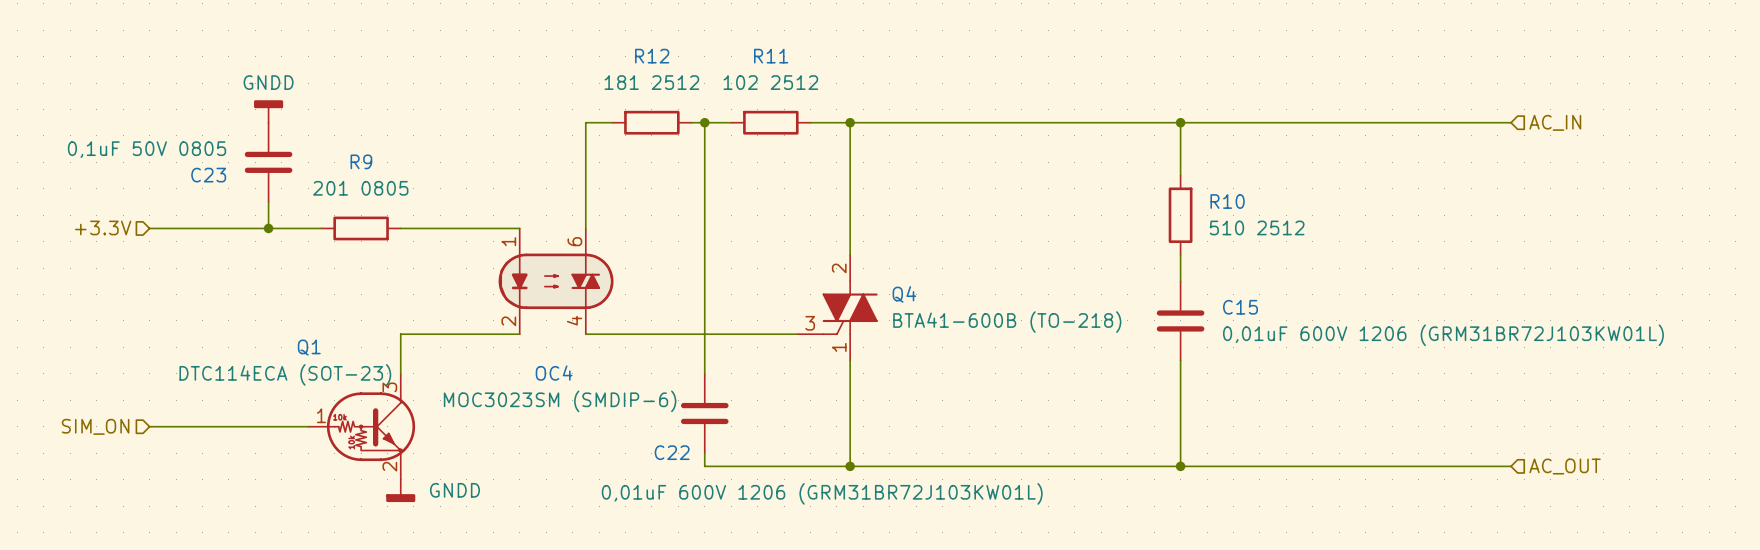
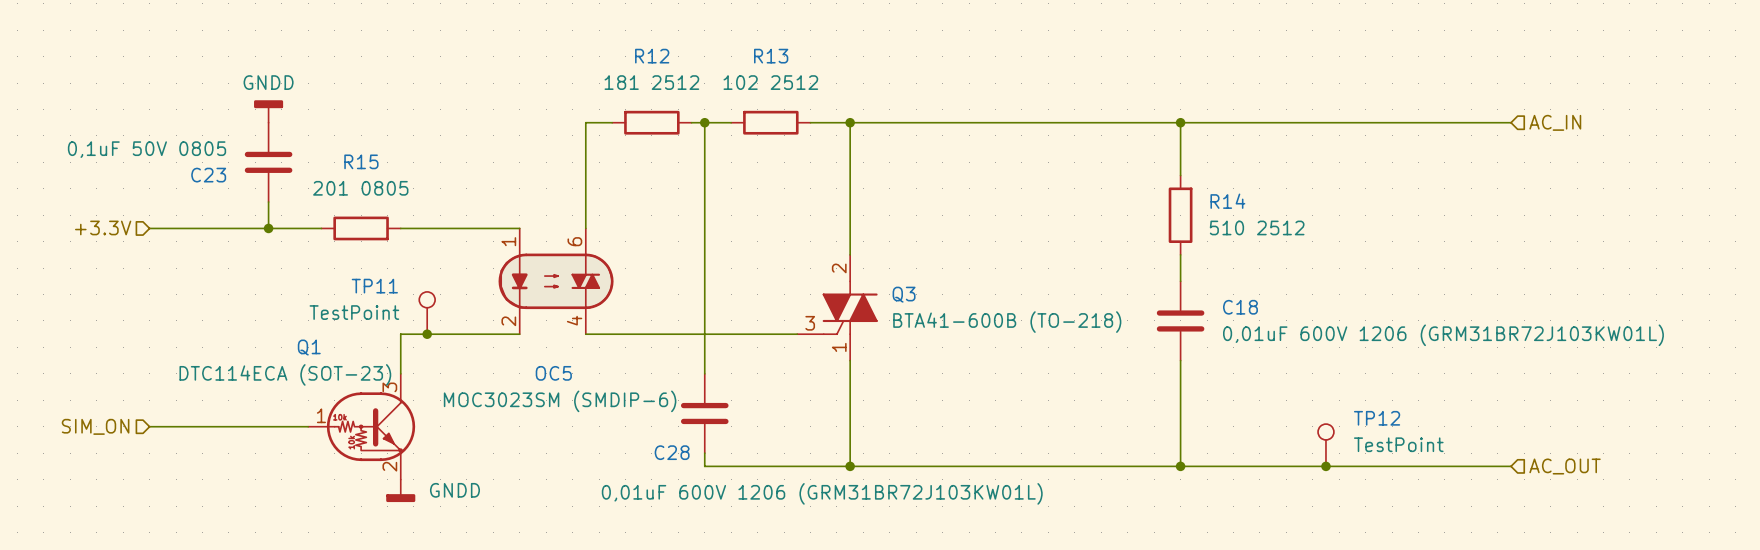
R11 name: R11 (771, 56) -> R13 (771, 56)
R9 name: R9 (361, 161) -> R15 (361, 161)
R10 name: R10 (1227, 201) -> R14 (1227, 201)
Q4 name: Q4 (904, 294) -> Q3 (904, 294)
C15 name: C15 (1240, 307) -> C18 (1240, 307)
TP11: none -> TestPoint (427, 313)
junction: none -> (427, 334)
OC4 name: OC4 (554, 373) -> OC5 (553, 373)
TP12: none -> TestPoint (1325, 445)
C22 name: C22 (672, 452) -> C28 (672, 452)
junction: none -> (1325, 466)

